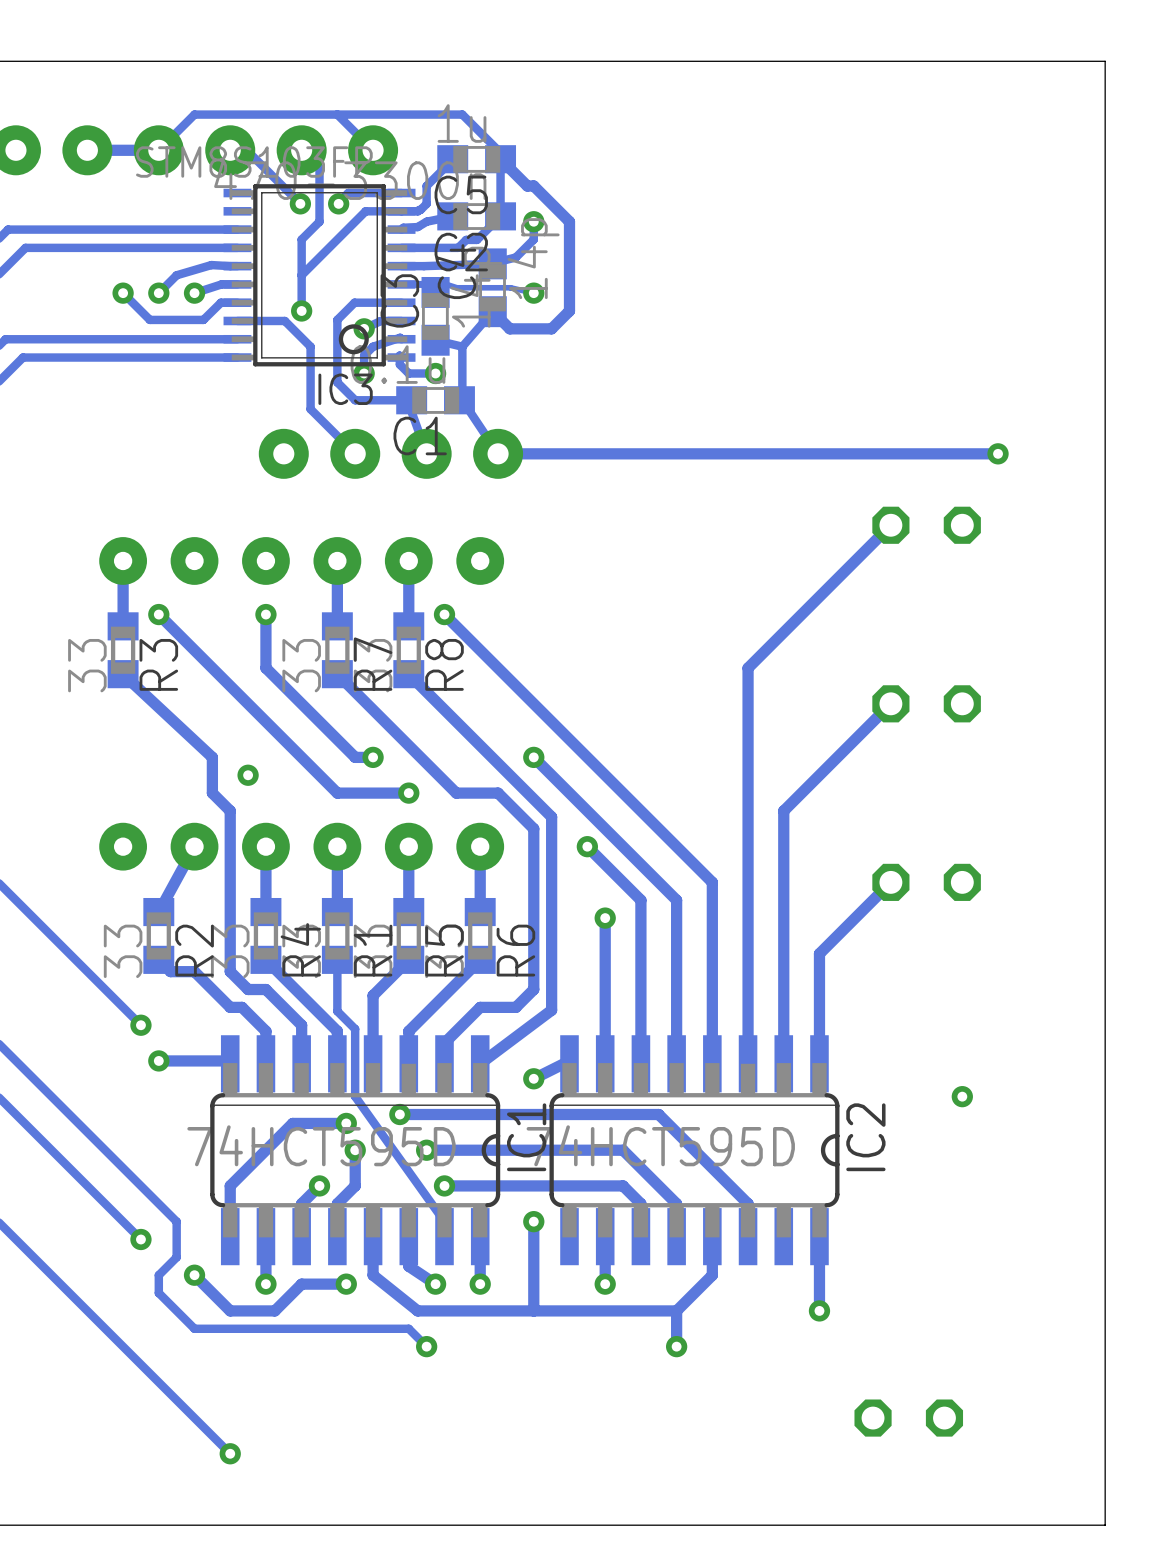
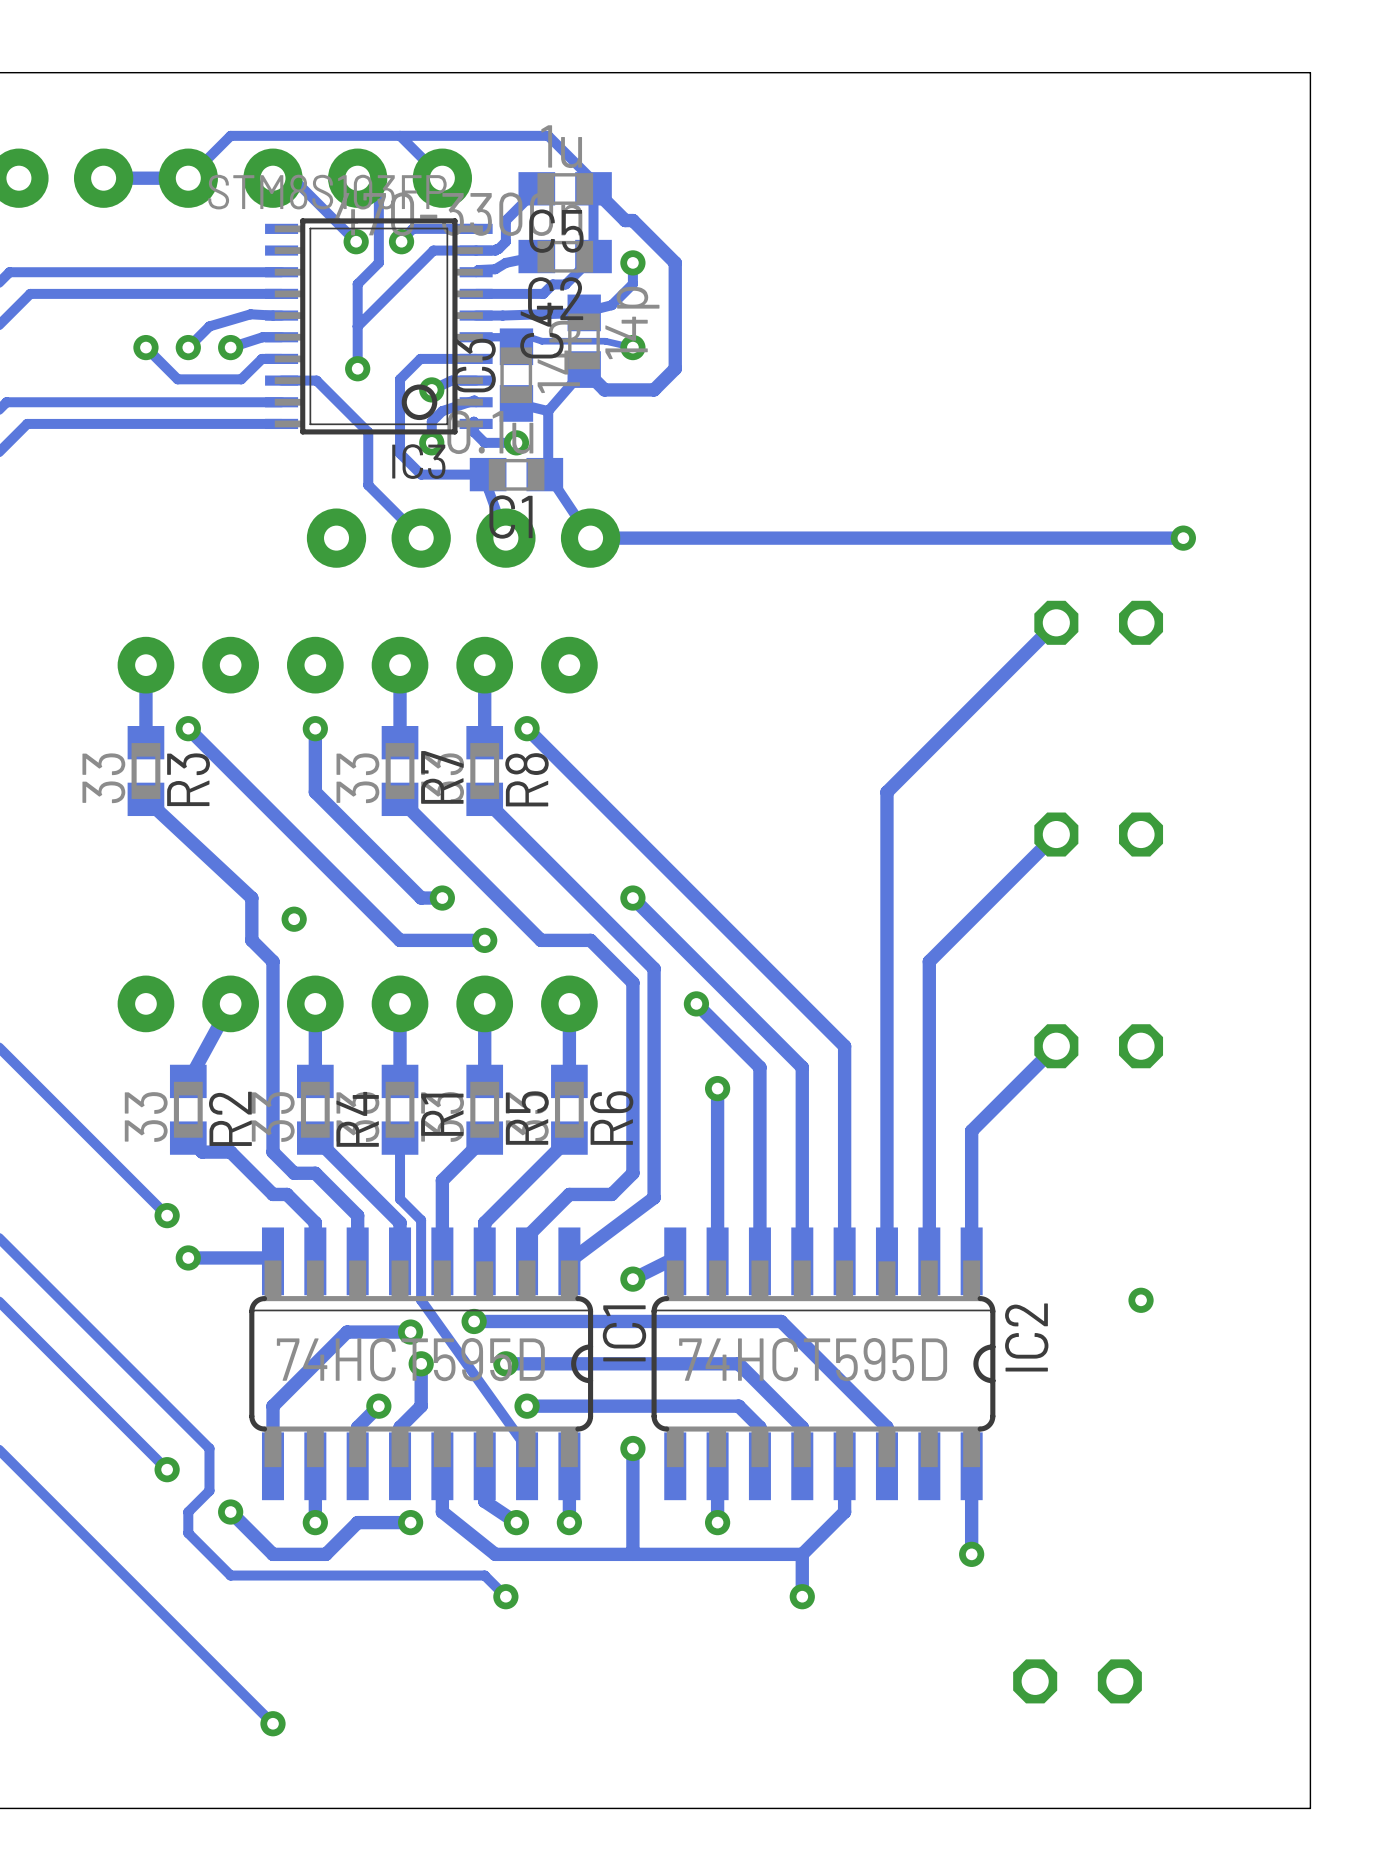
track: (267, 320) (284, 320) (310, 346) (310, 364) -> (316, 380) (368, 432)

